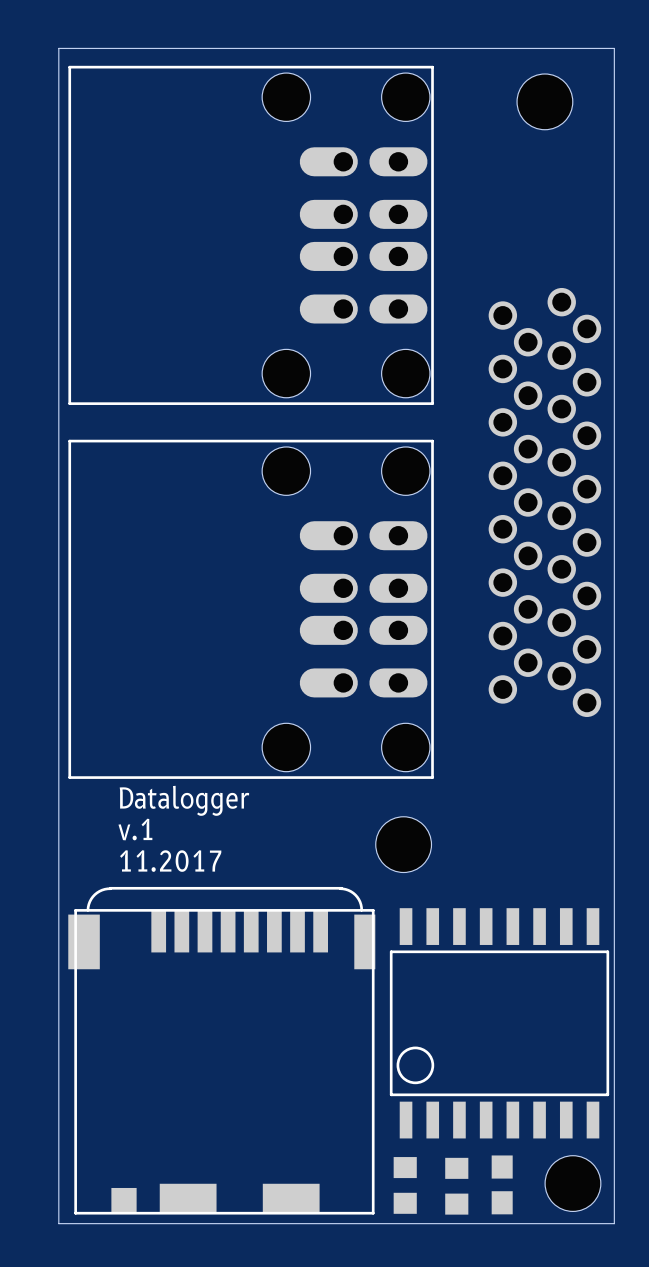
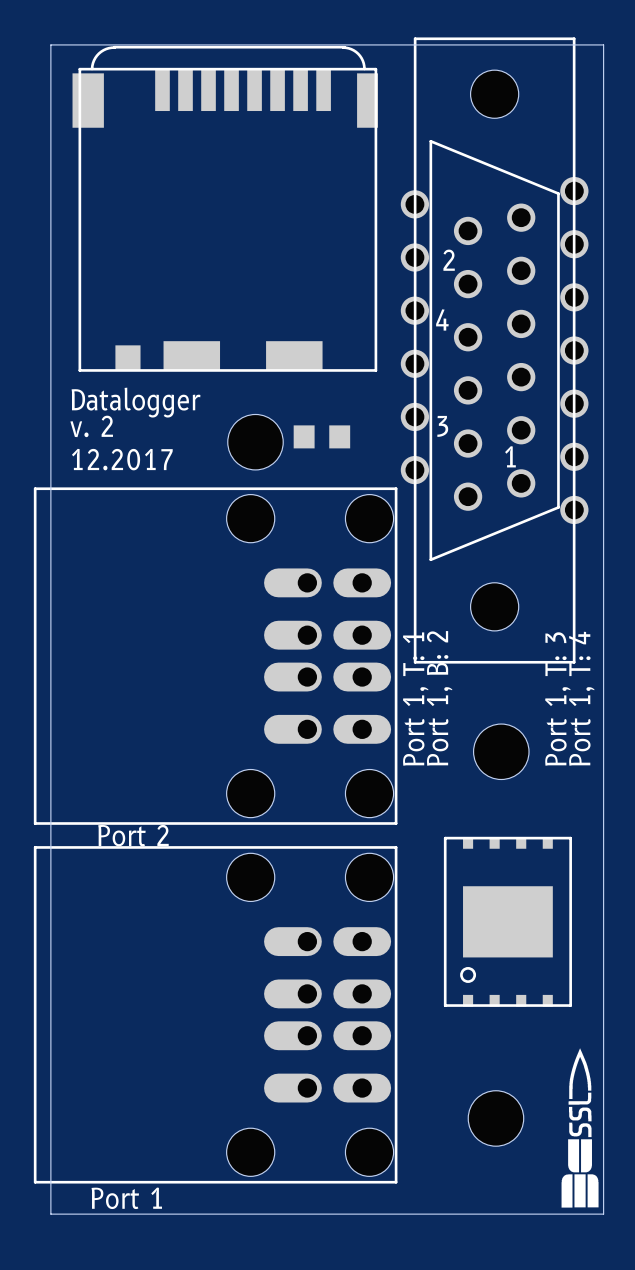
hole: (544, 101) -> none
part: none -> (225, 208)
part: (251, 235) -> none
text: none -> 2 (449, 260)
text: none -> 4 (442, 319)
part: none -> (494, 350)
text: none -> v. 2 (91, 426)
text: none -> 3 (442, 426)
part: none -> (321, 436)
hole: none -> (255, 442)
text: none -> 1 (510, 456)
text: none -> 12.2017 (122, 459)
part: (544, 502) -> none
part position: (251, 609) -> (215, 656)
text: none -> Port 1, T: 1 (415, 699)
text: none -> Port 1, B: 2 (439, 698)
text: none -> Port 1, T: 3 (557, 699)
text: none -> Port 1, T: 4 (581, 698)
text position: Datalogger (184, 800) -> Datalogger (136, 402)
text: v.1 (135, 829) -> none
text: none -> Port 2 (133, 835)
hole position: (403, 844) -> (501, 751)
text: 11.2017 (170, 861) -> none
part: none -> (507, 921)
part: none -> (215, 1014)
part: (499, 1023) -> none
part: (221, 1050) -> none
drawing: none -> [561, 1048, 599, 1208]
hole position: (572, 1183) -> (495, 1118)
part: (502, 1184) -> none
part: (405, 1185) -> none
part: (456, 1186) -> none
text: none -> Port 1 (126, 1198)

